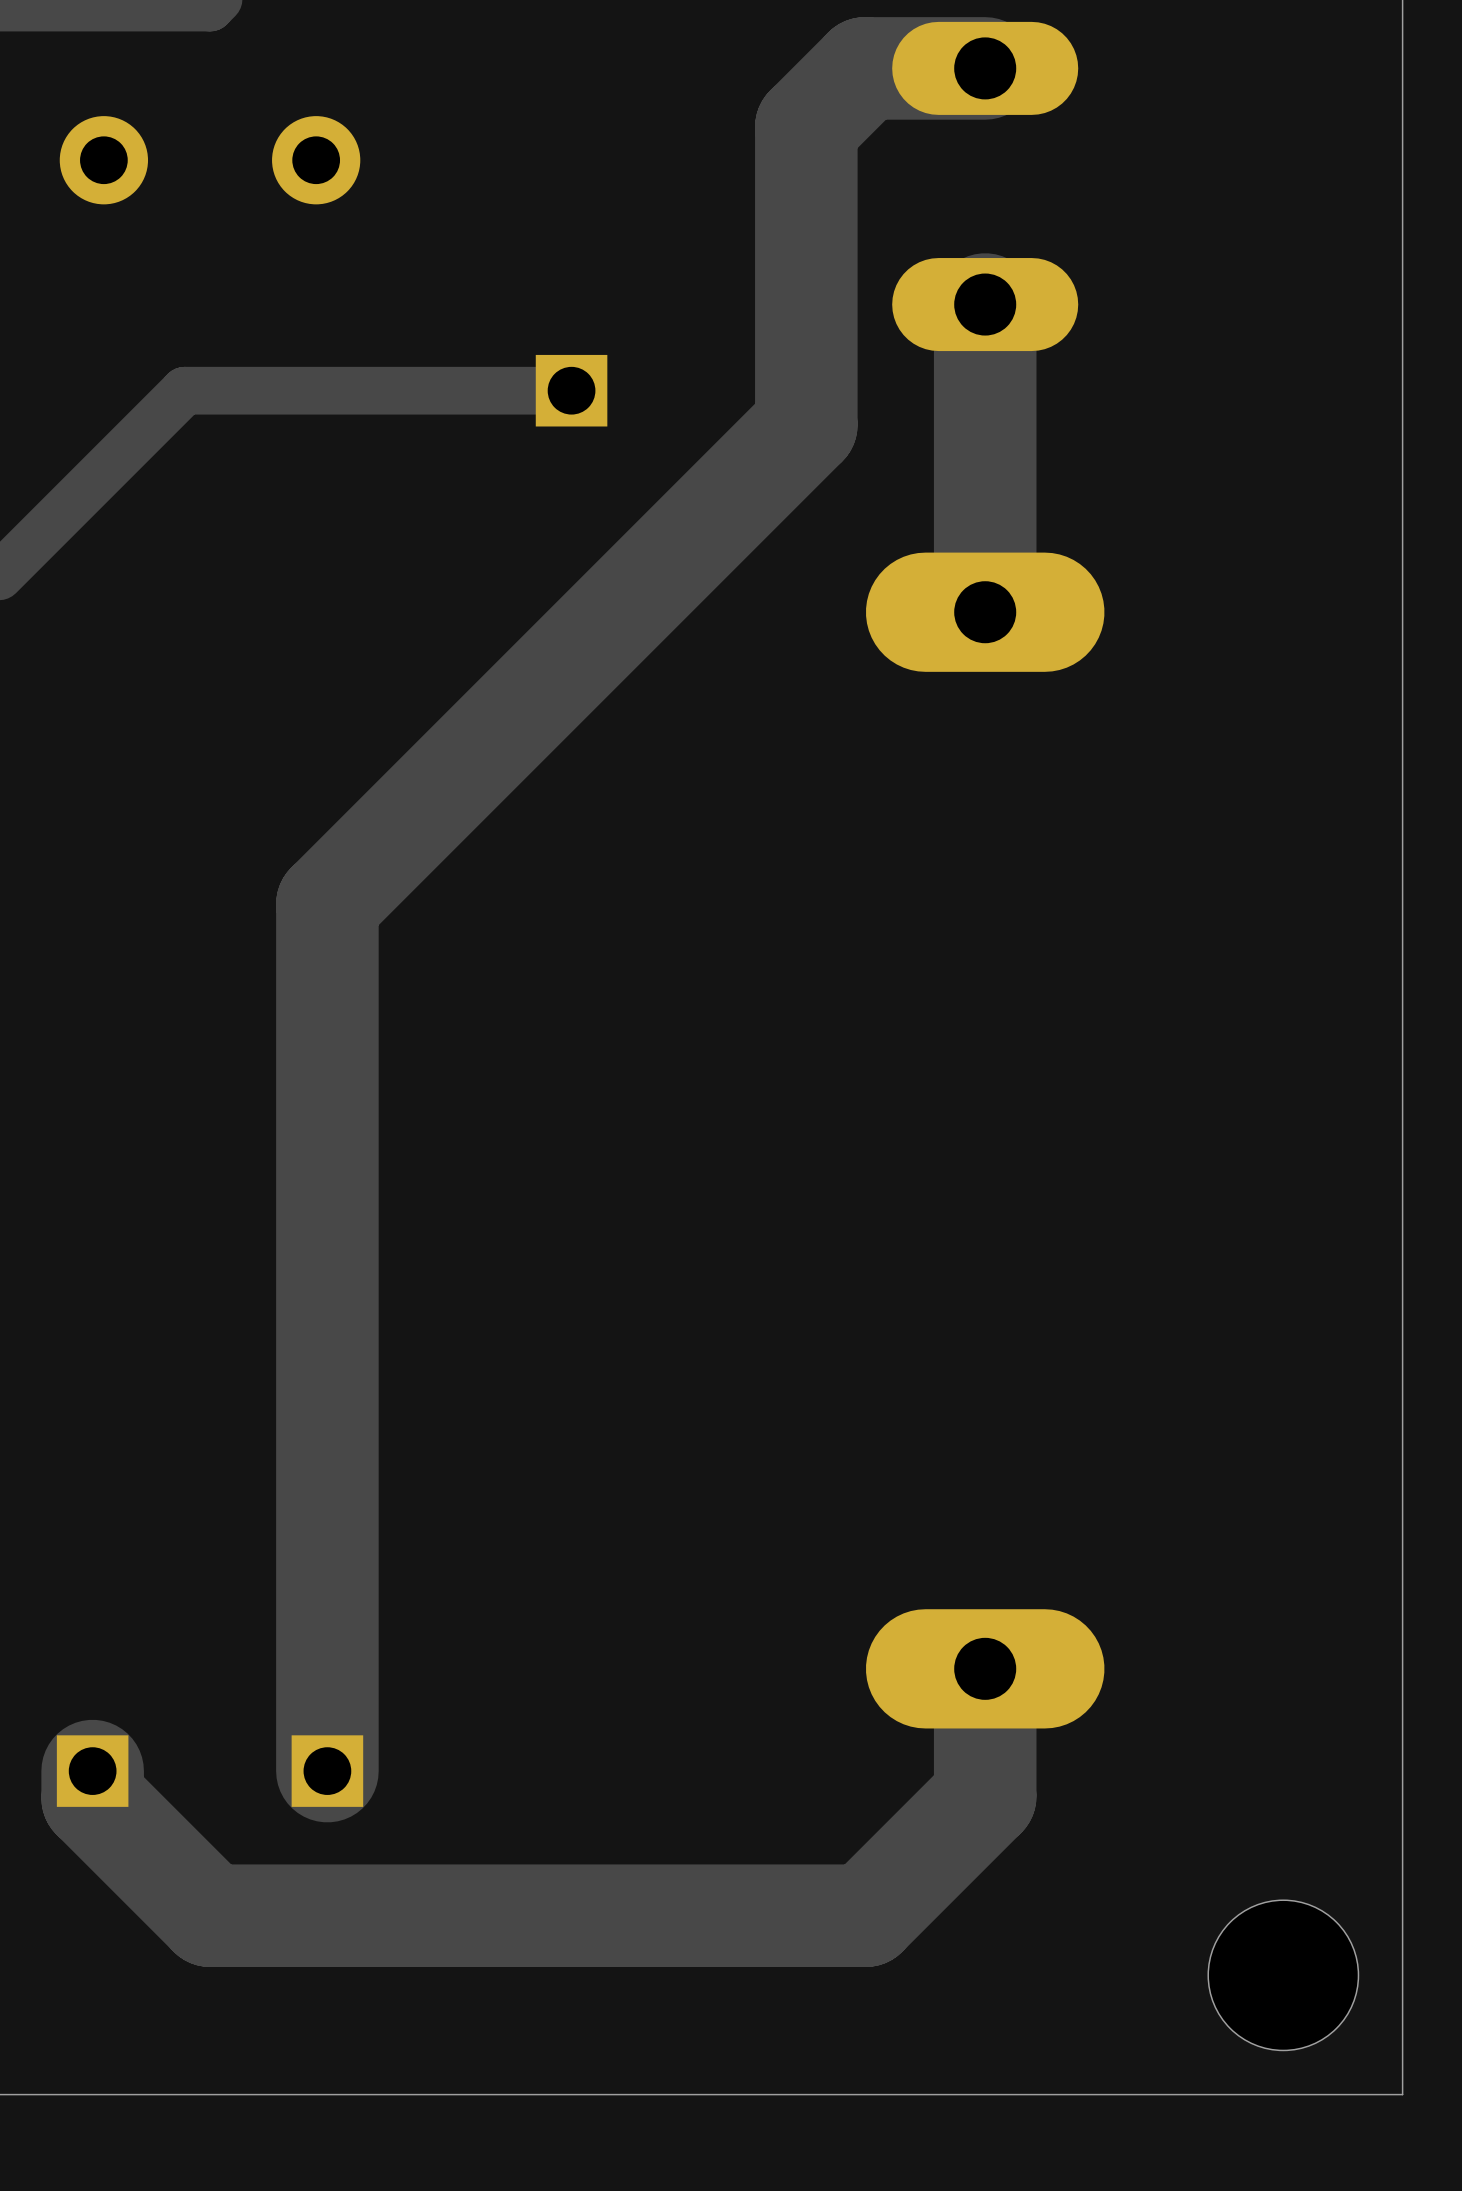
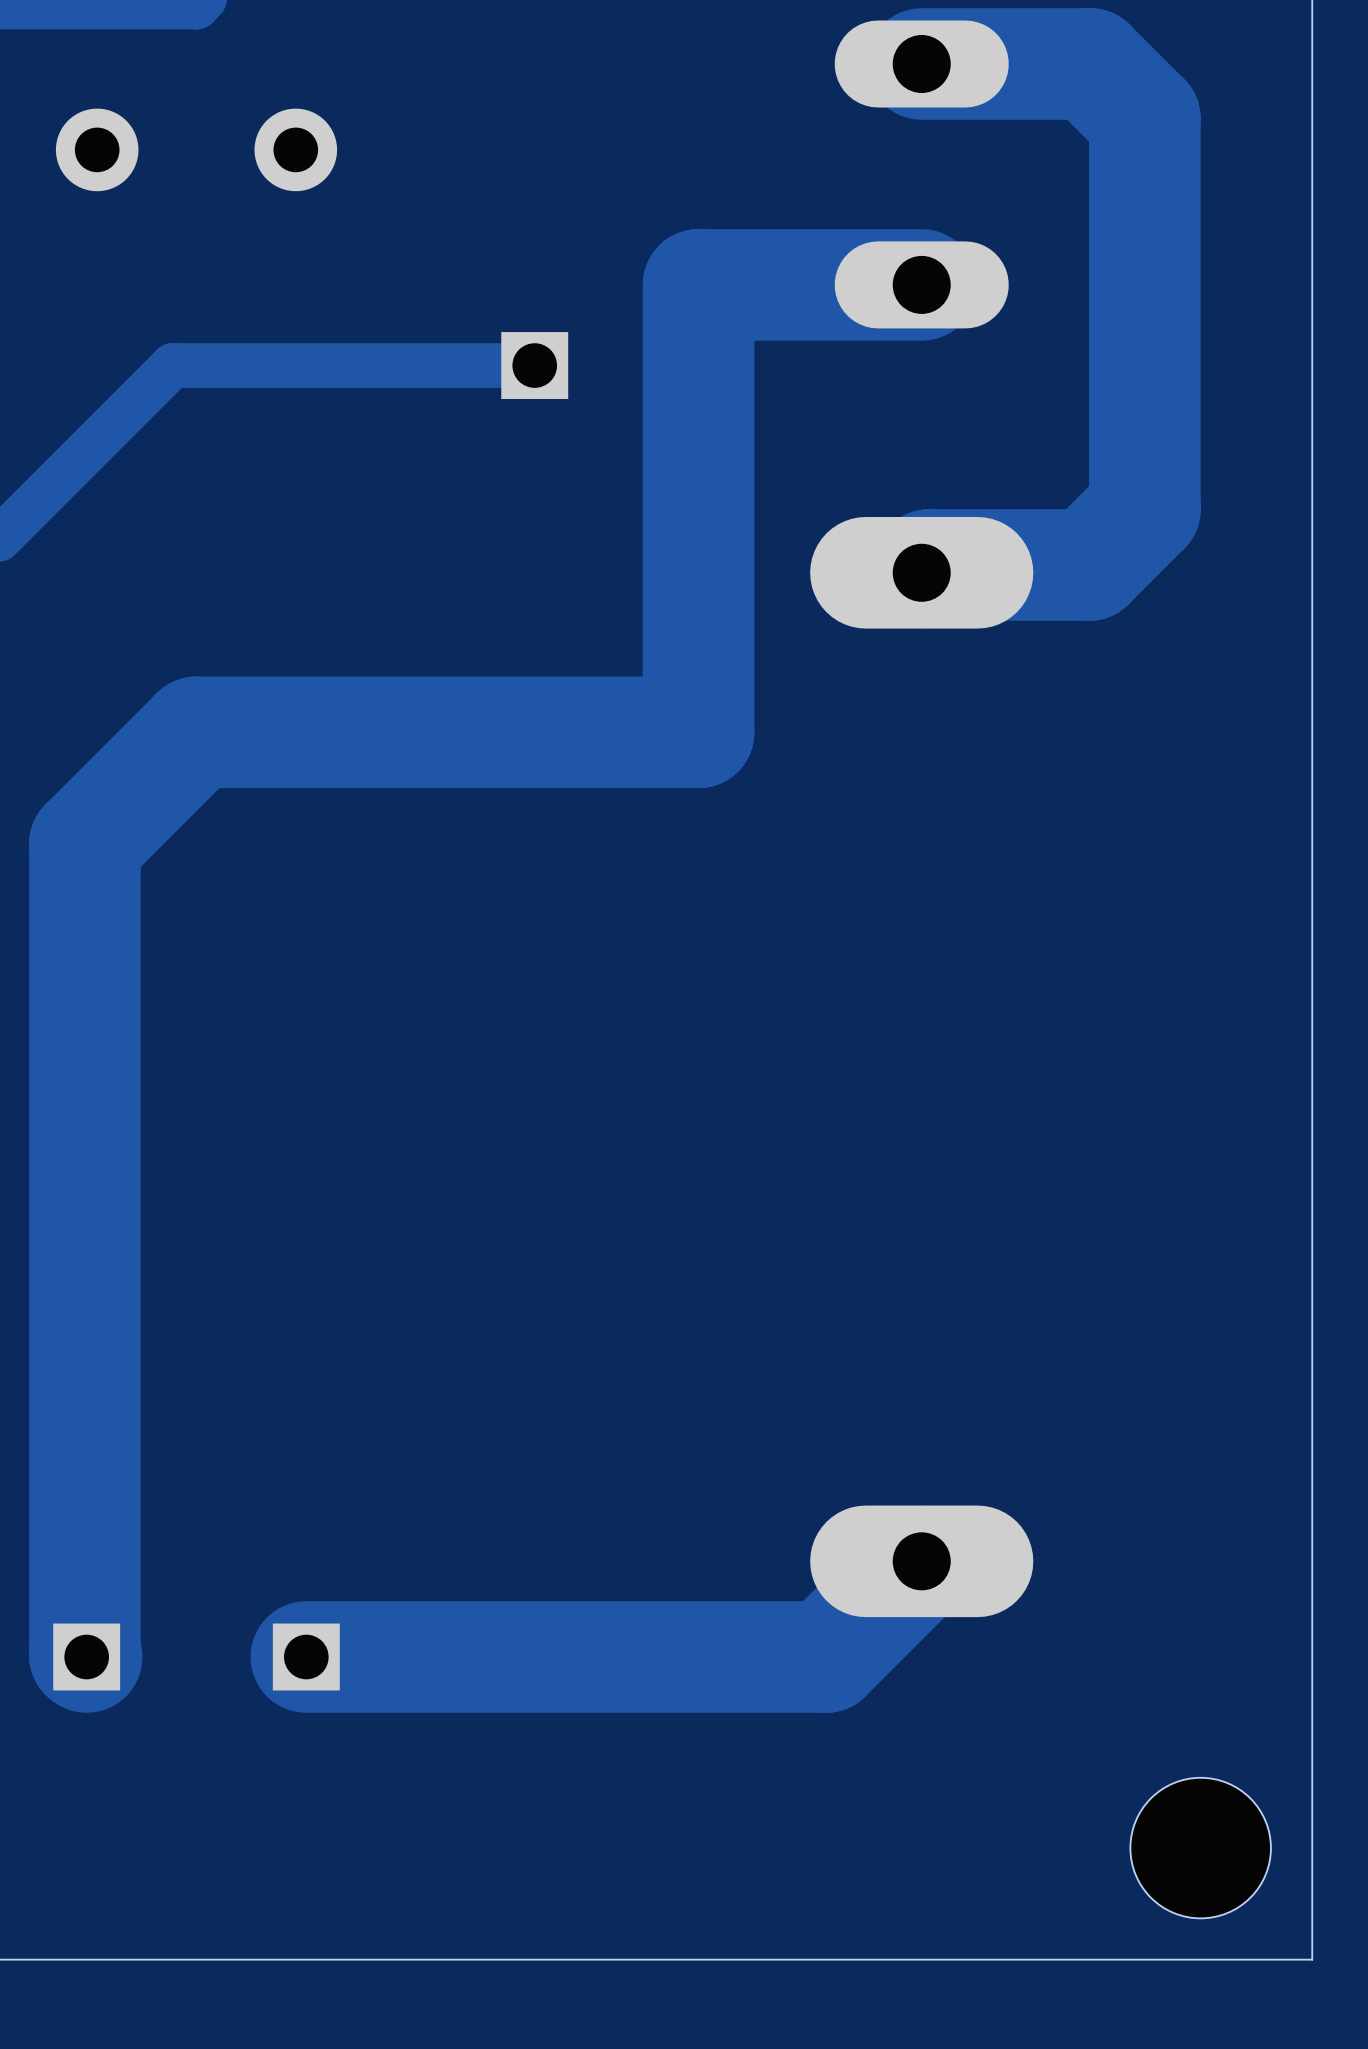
track: (985, 68) (864, 68) (806, 126) (806, 424) (327, 903) (327, 1771) -> none
track: (985, 304) (985, 612) -> (921, 64) (1090, 64) (1144, 118) (1144, 509) (1089, 564) (929, 564) (921, 572)
track: none -> (921, 284) (698, 284) (698, 732) (196, 732) (84, 843) (84, 1655) (86, 1657)
track: (985, 1668) (985, 1796) (865, 1915) (210, 1915) (92, 1798) (92, 1771) -> (921, 1561) (826, 1657) (306, 1657)

